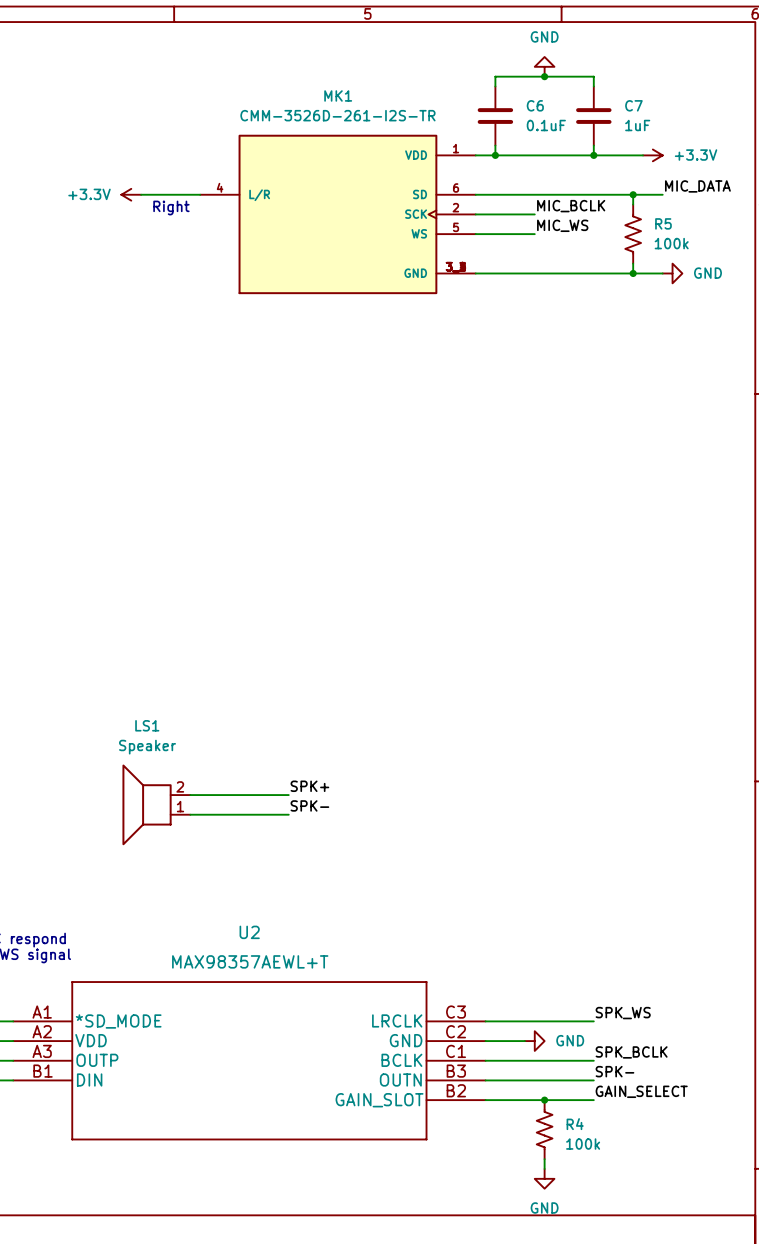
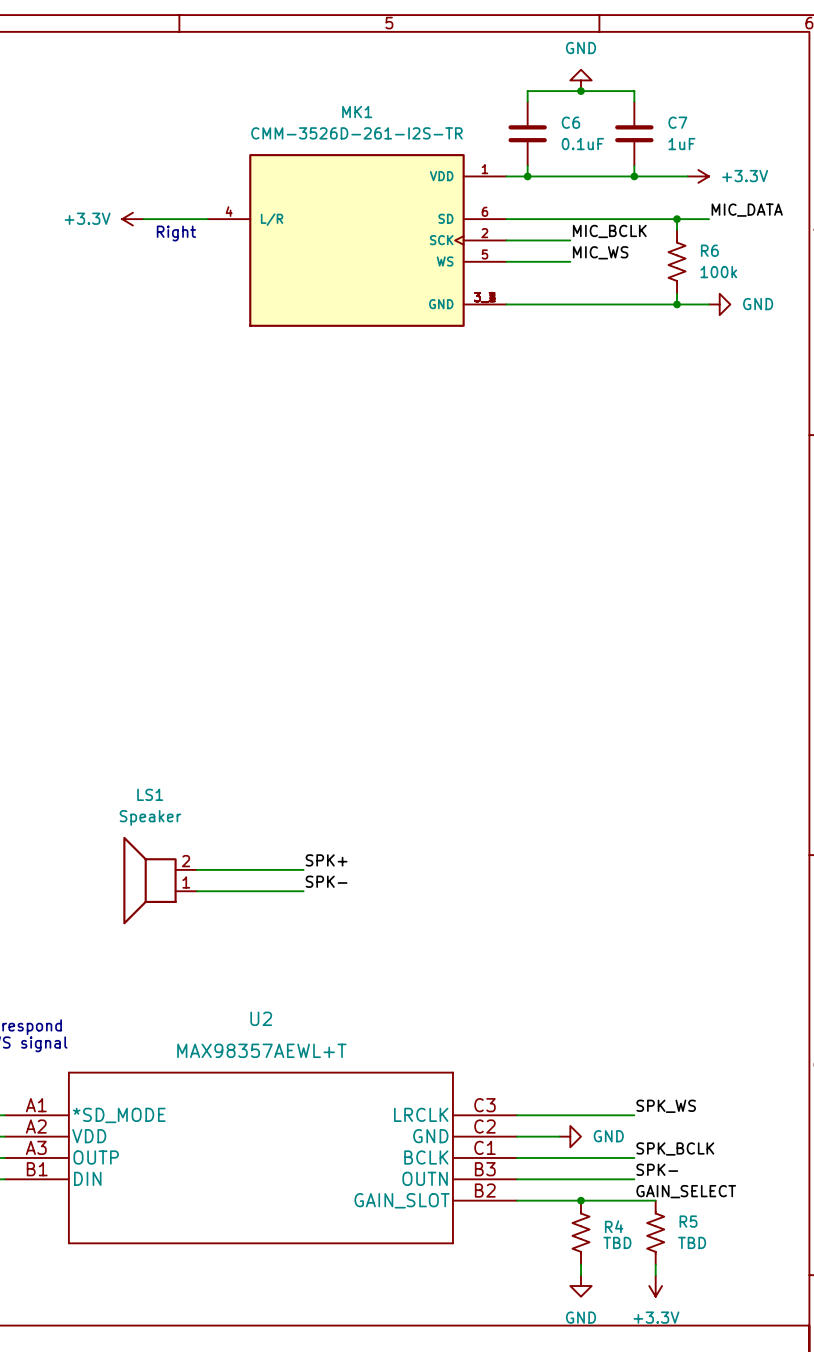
R5 name: R5 (663, 223) -> R6 (709, 250)
wire: none -> (634, 1200) (655, 1200)
R5: none -> TBD (655, 1232)
R4 value: 100k (583, 1144) -> TBD (617, 1242)
wire: none -> (655, 1264) (655, 1275)
power symbol: none -> +3.3V (655, 1286)

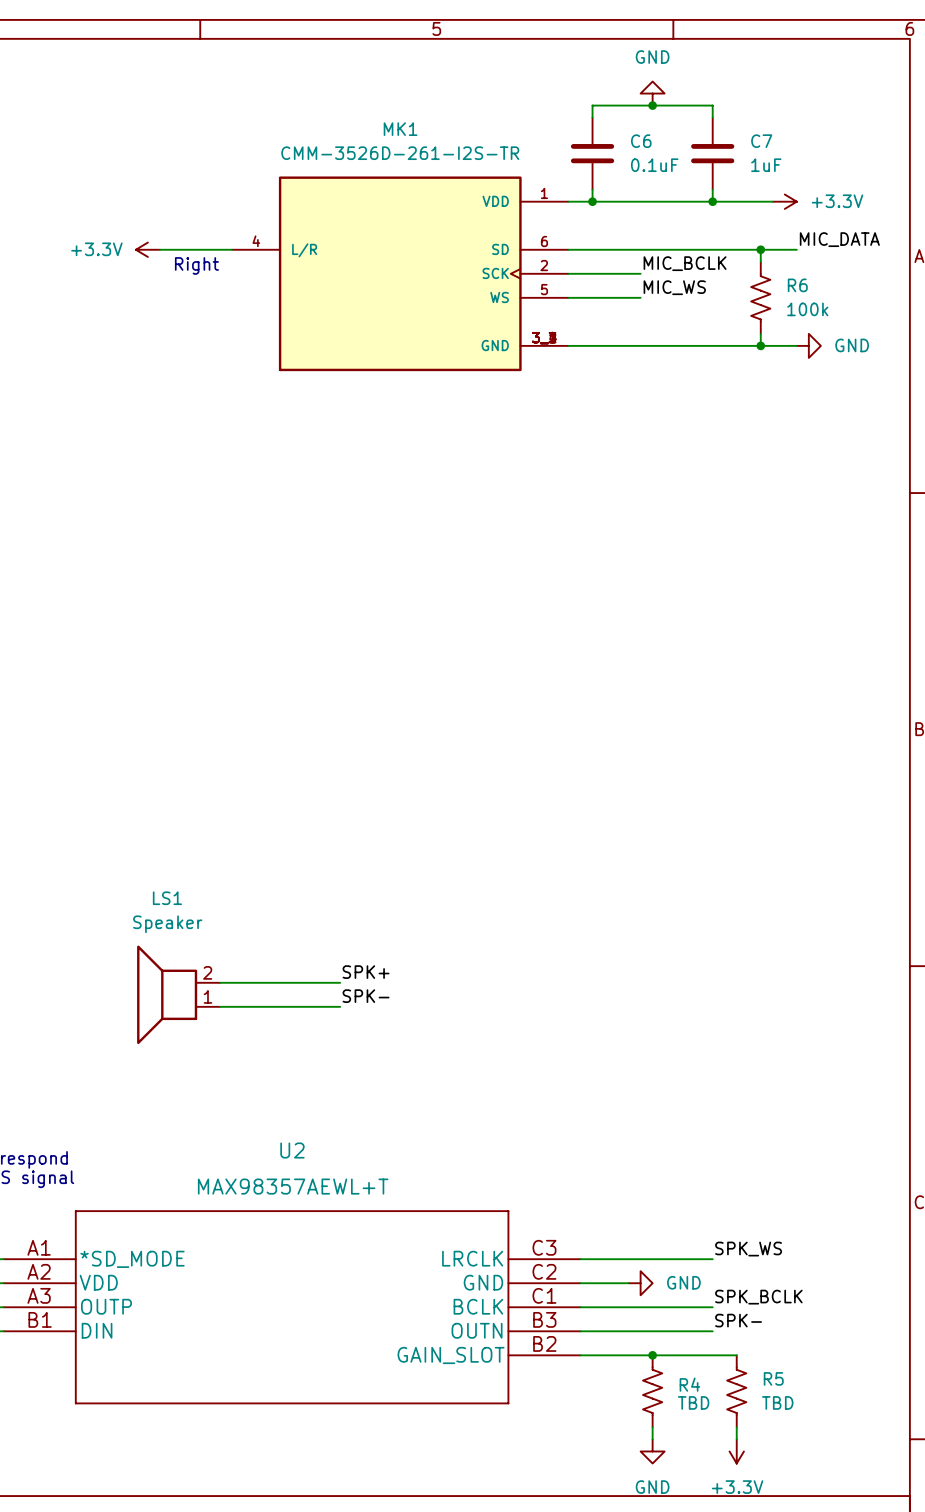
label: GAIN_SELECT (686, 1191) -> none

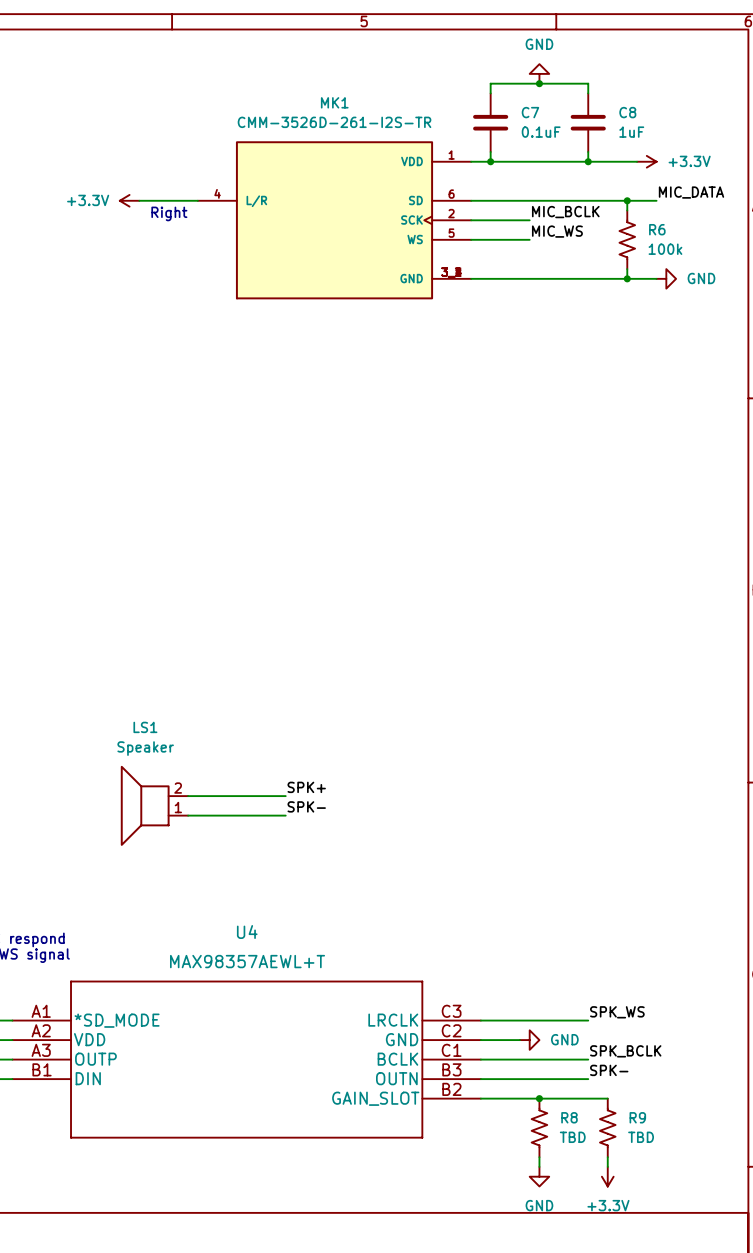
C6 name: C6 (641, 141) -> C7 (530, 112)
C7 name: C7 (761, 141) -> C8 (627, 112)
U2 name: U2 (292, 1150) -> U4 (247, 932)
R5 name: R5 (773, 1378) -> R9 (637, 1117)
R4 name: R4 (689, 1384) -> R8 (569, 1117)

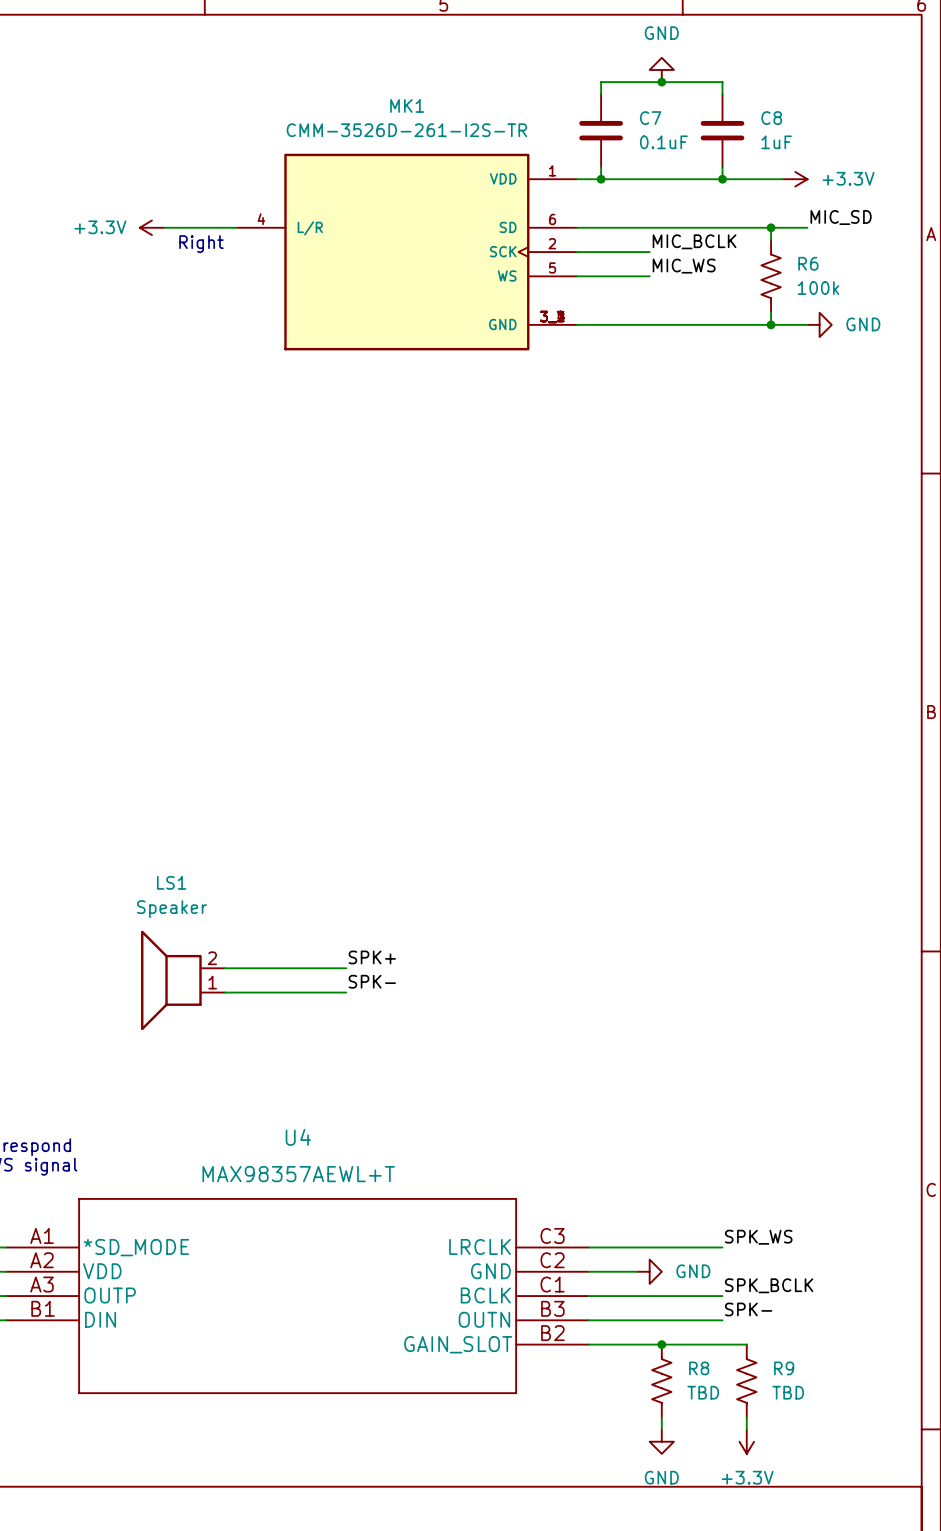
label: MIC_DATA (691, 192) -> MIC_SD (841, 217)

